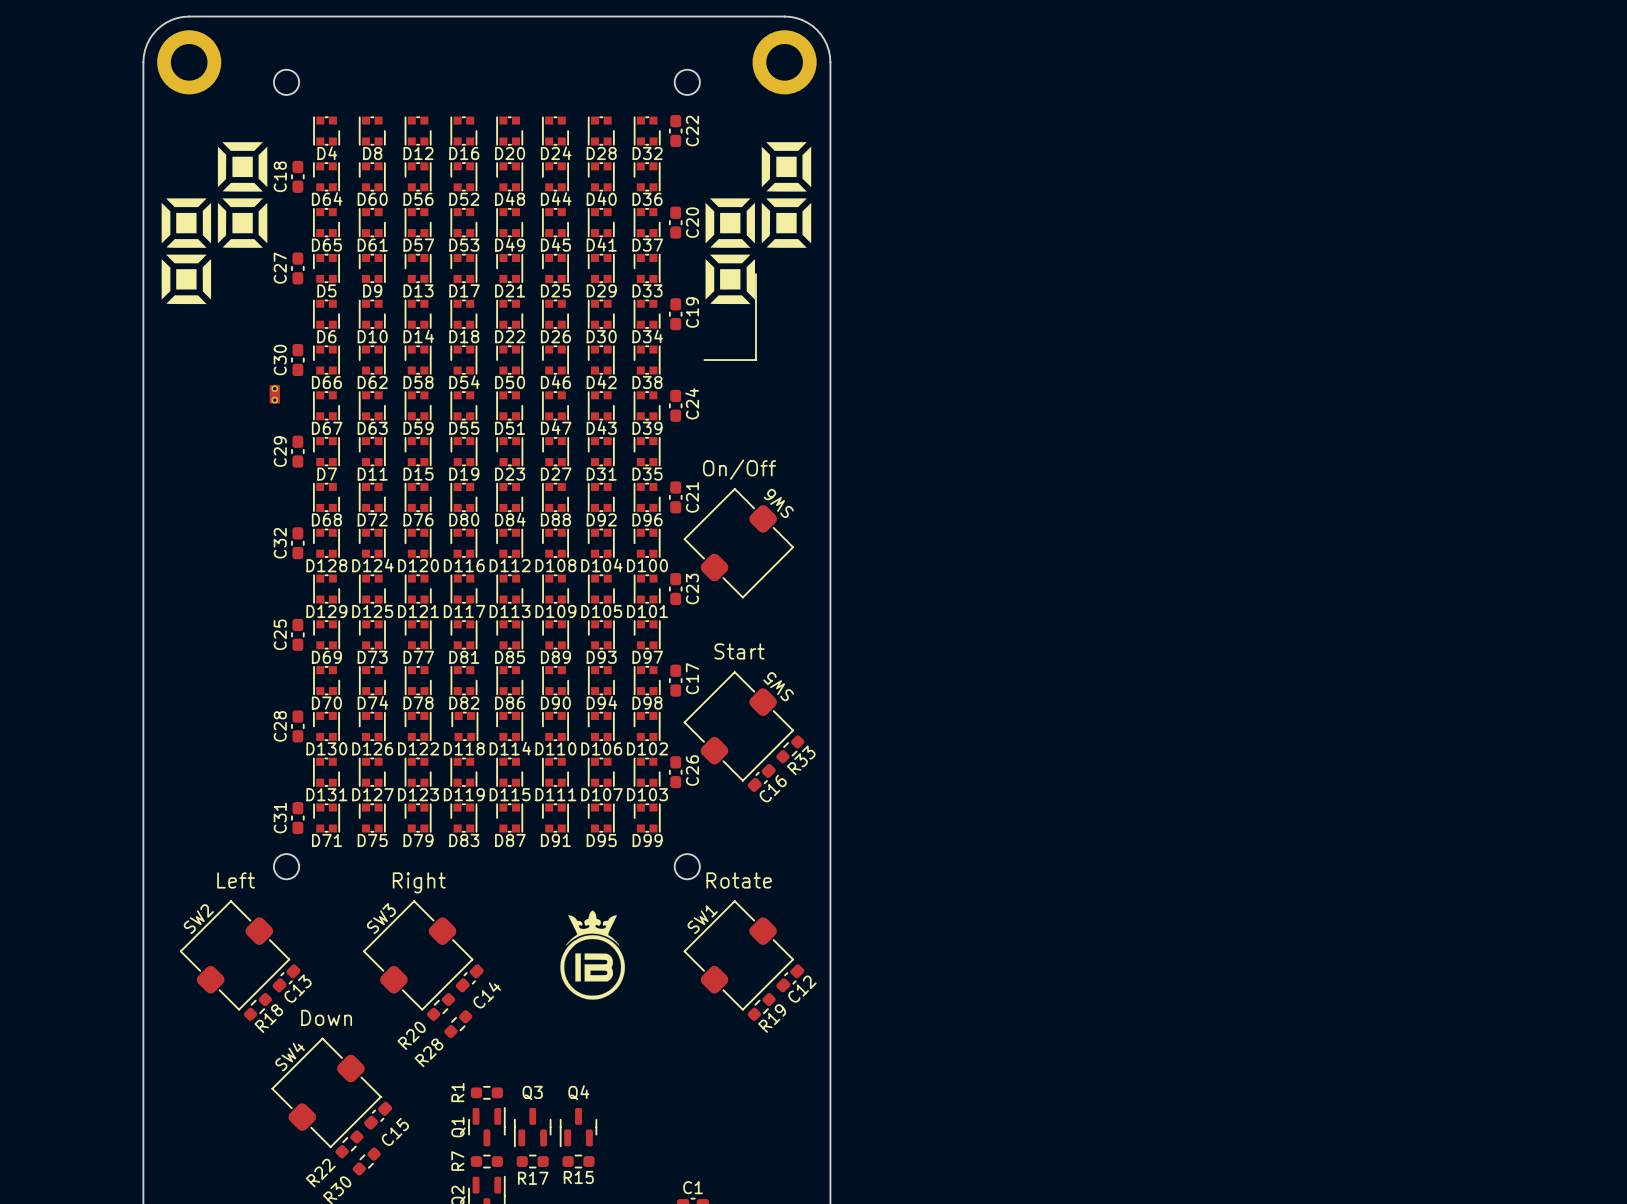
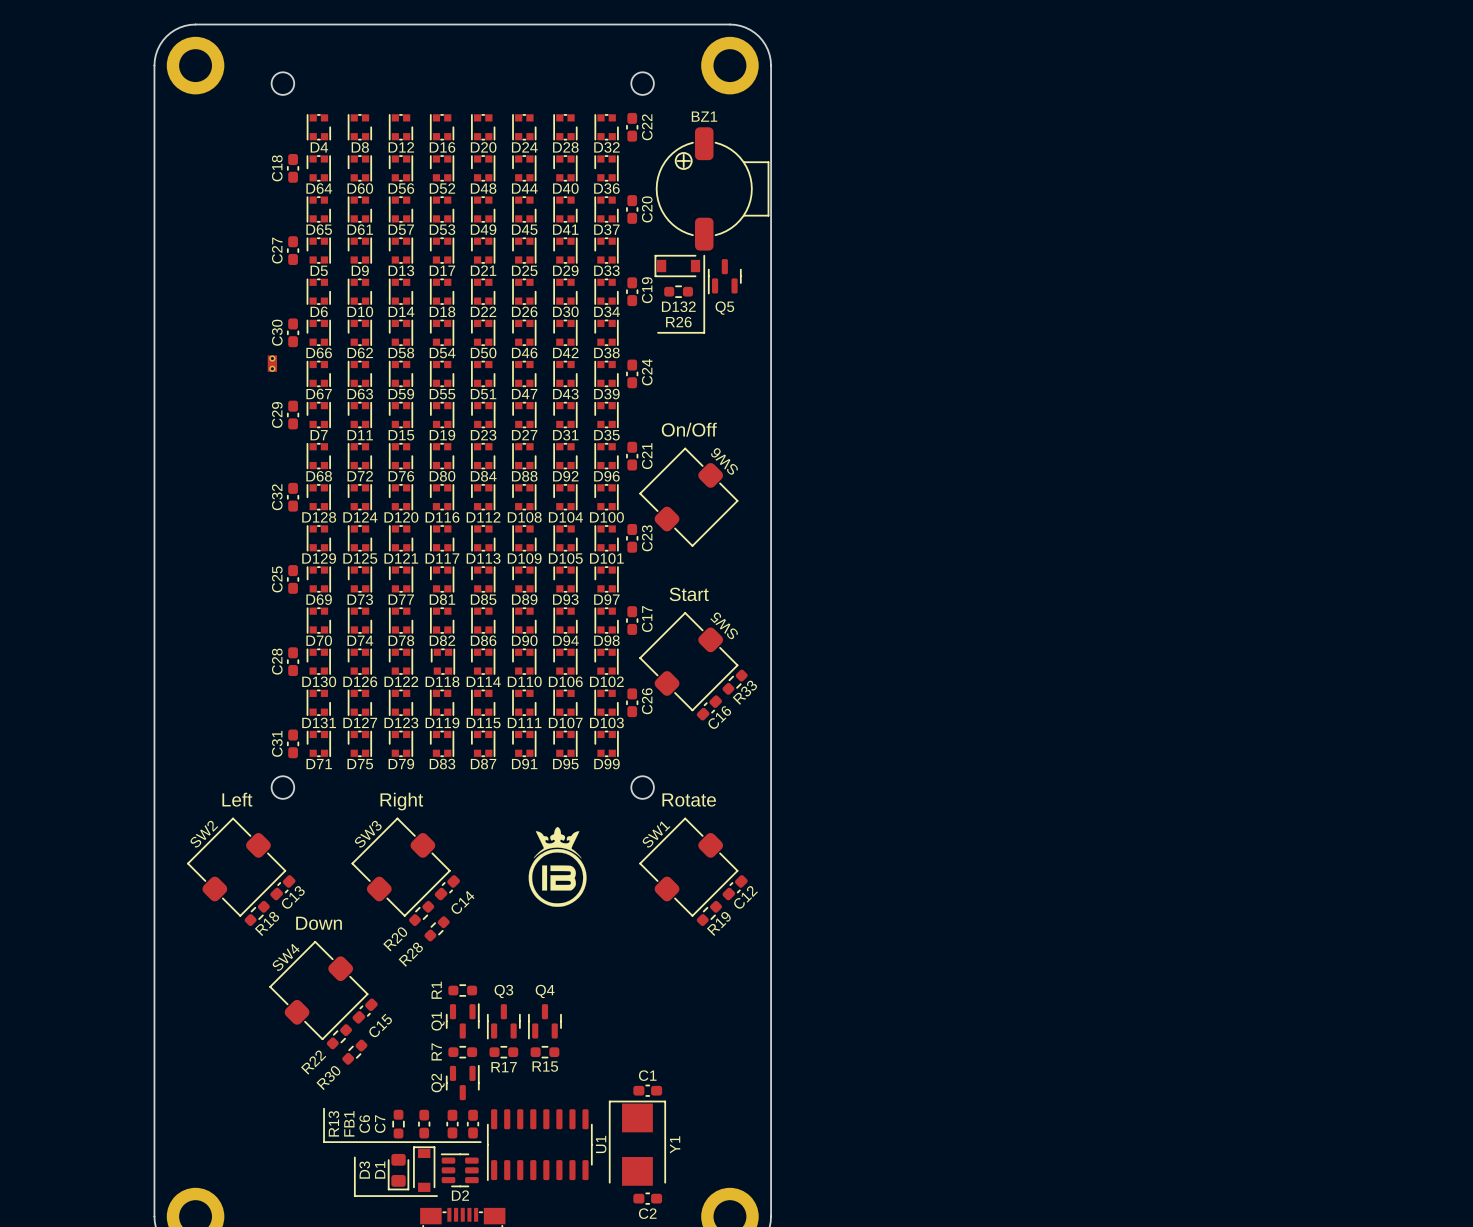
drawing: [161, 142, 268, 305] -> none
drawing: [705, 142, 812, 305] -> none
BZ1: none -> (712, 188)
D132: none -> (677, 266)
Q5: none -> (724, 276)
R26: none -> (678, 291)

